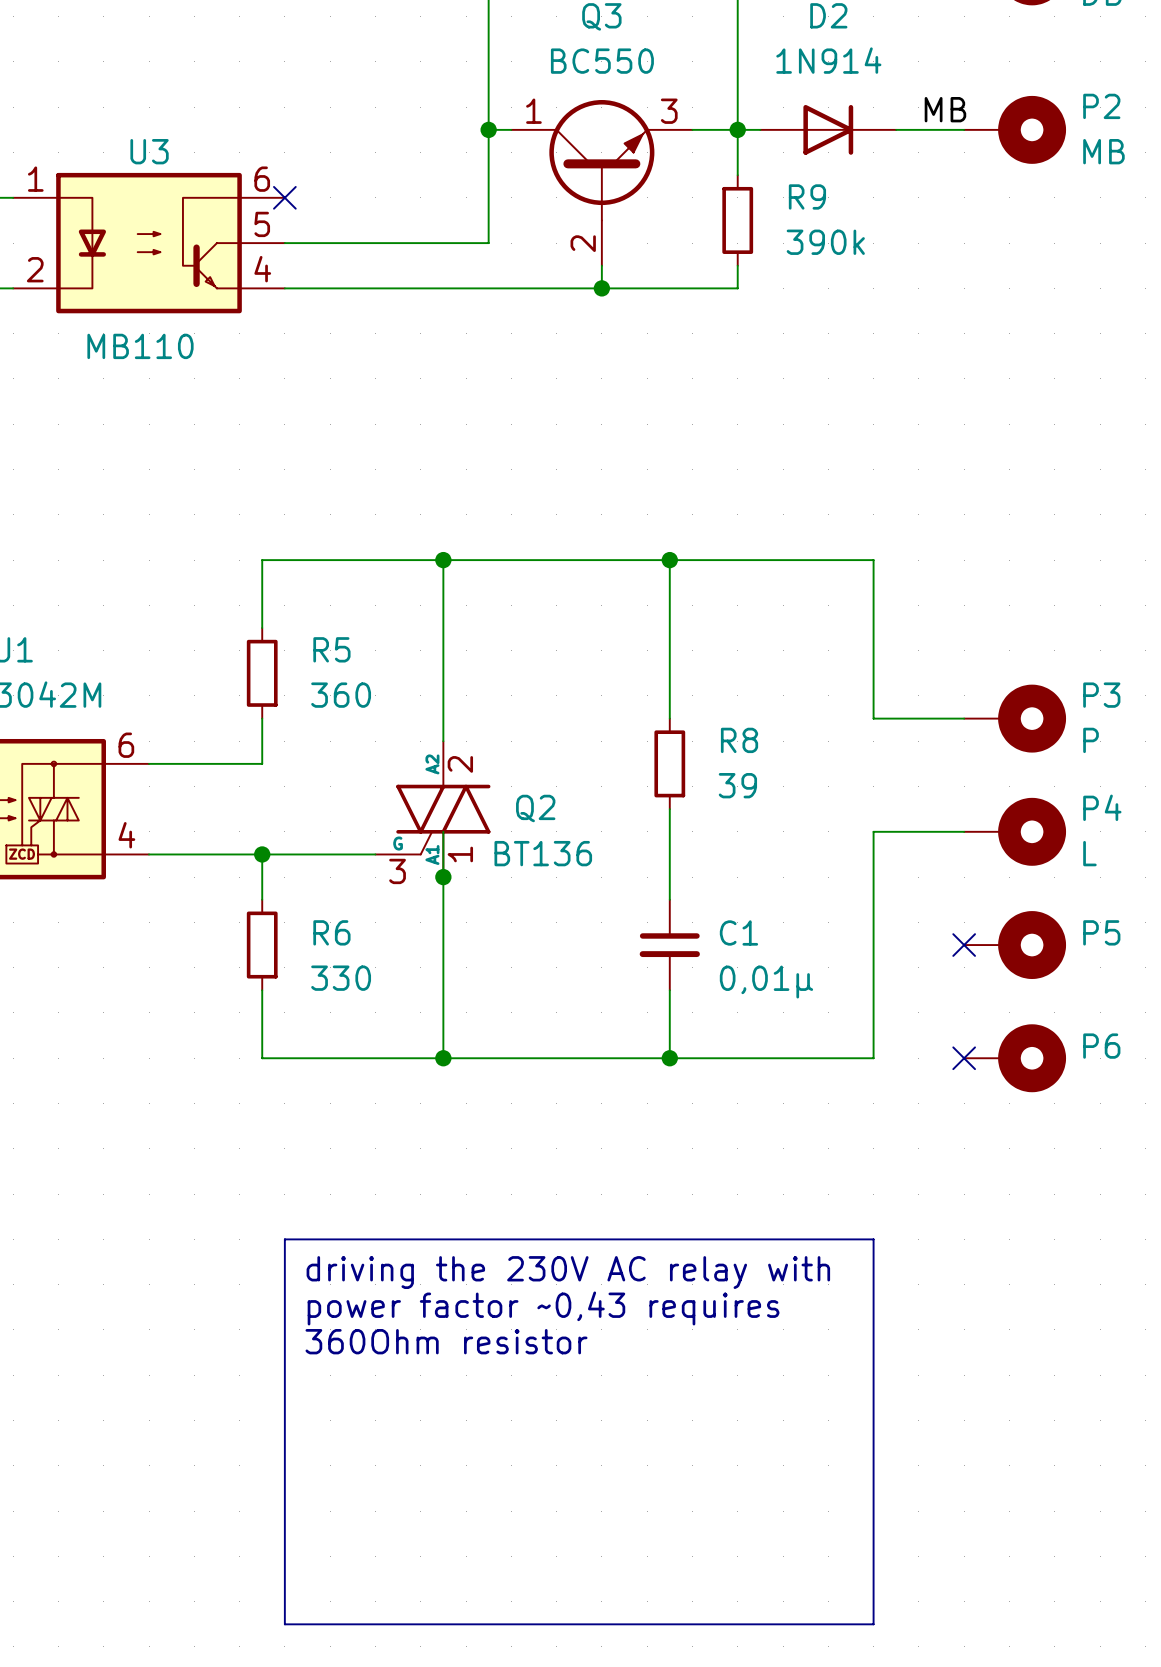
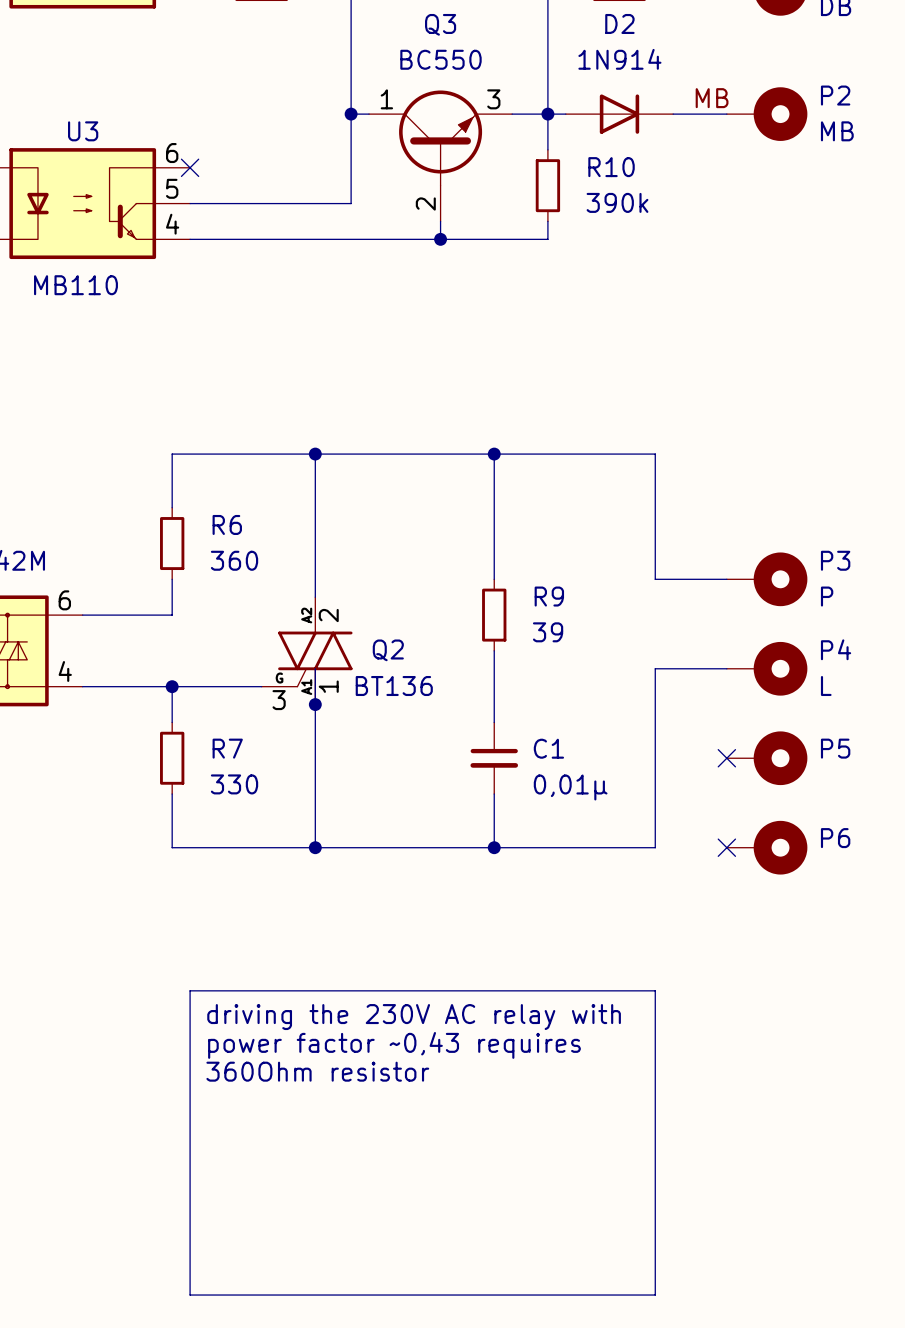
R9 name: R9 (807, 196) -> R10 (611, 167)
R5 name: R5 (331, 649) -> R6 (227, 524)
R8 name: R8 (739, 740) -> R9 (549, 596)
R6 name: R6 (331, 932) -> R7 (227, 748)

